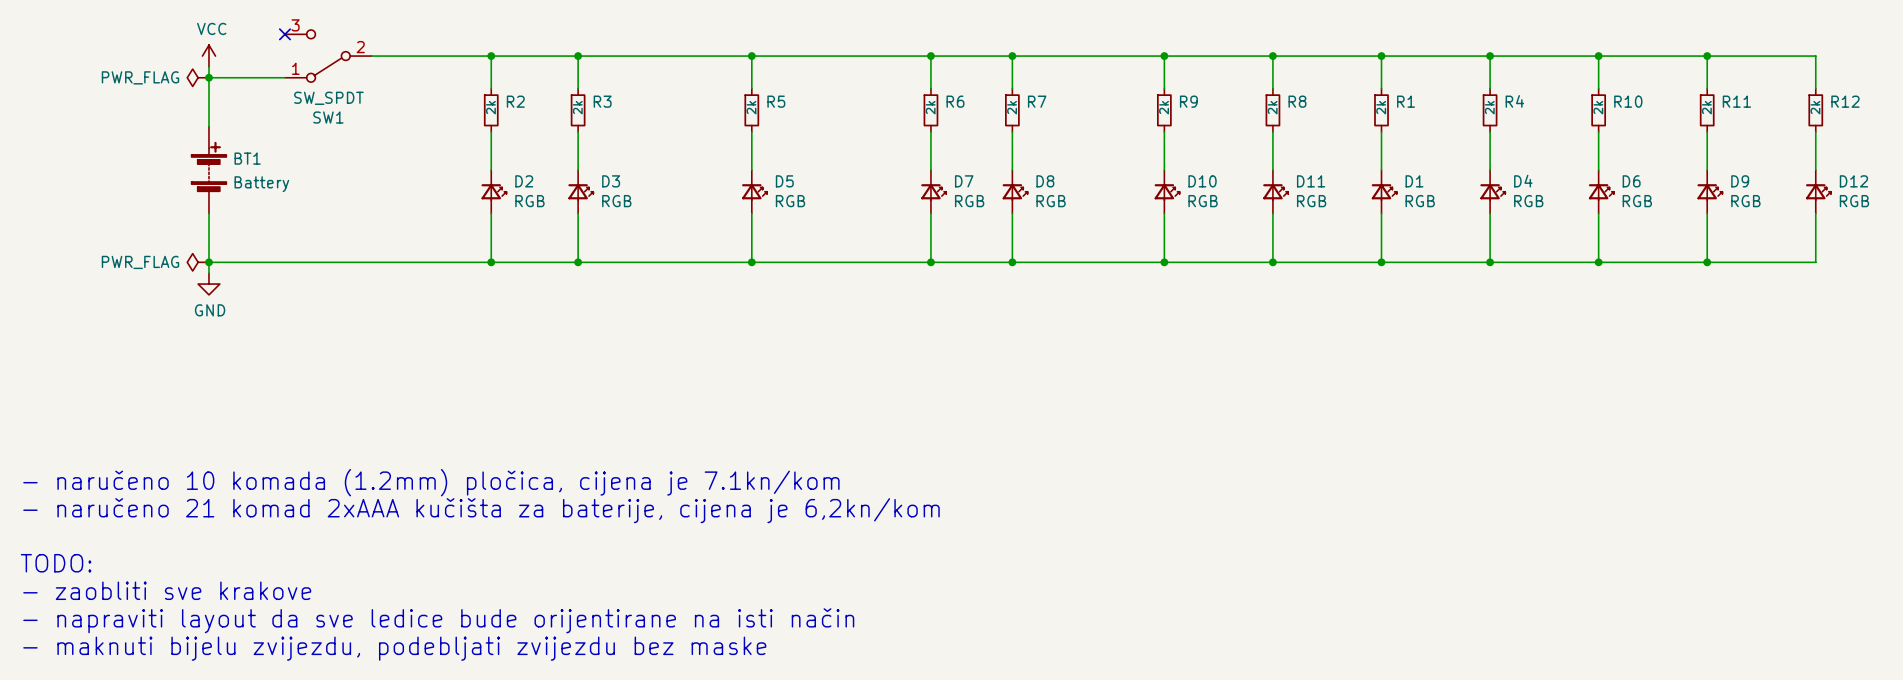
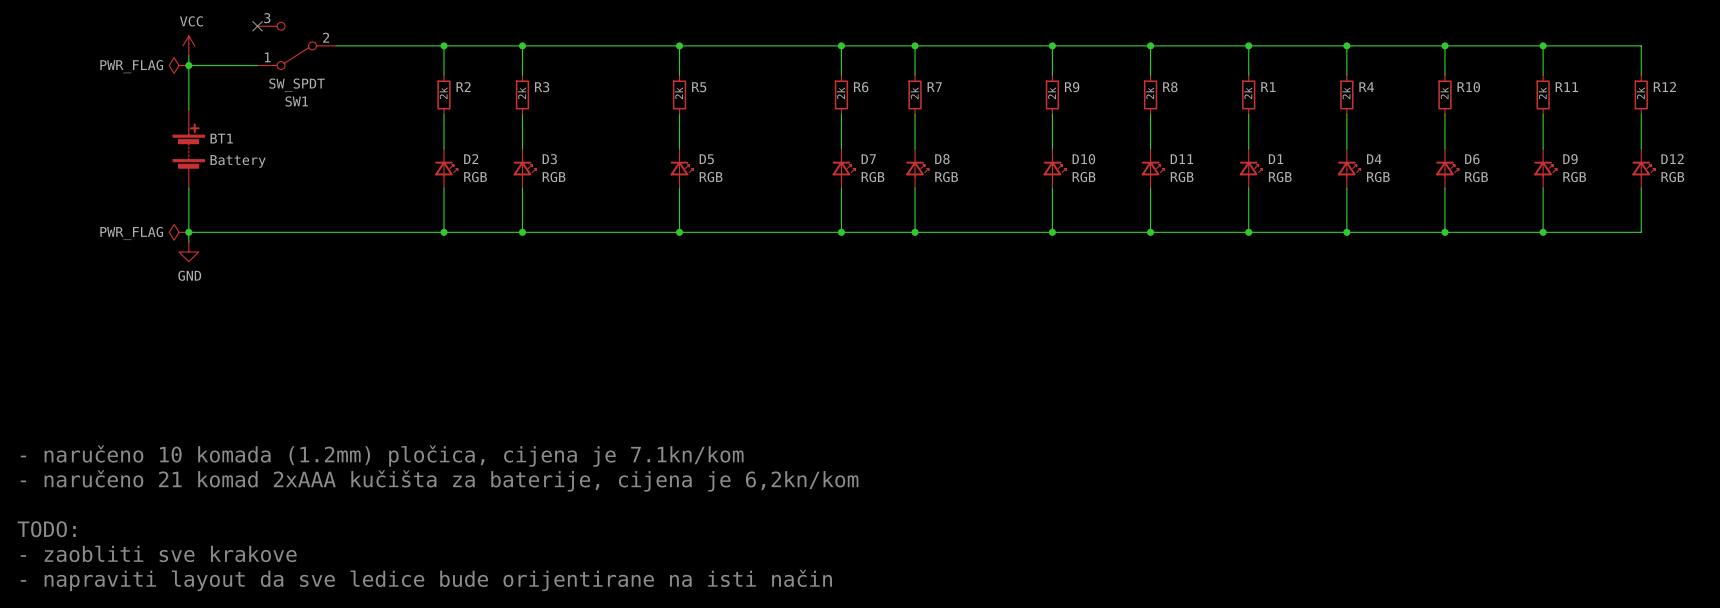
text: - naručeno 10 komada (1.2mm) pločica, cijena je 7.1kn/kom (431, 482) -> none
text: - naručeno 21 komad 2xAAA kučišta za baterije, cijena je 6,2kn/kom (481, 510) -> - naručeno 10 komada (1.2mm) pločica, cijena je 7.1kn/kom (382, 456)
text: none -> - naručeno 21 komad 2xAAA kučišta za baterije, cijena je 6,2kn/kom (439, 480)
text: TODO: (56, 563) -> none
text: - zaobliti sve krakove (167, 590) -> TODO: (46, 529)
text: - napraviti layout da sve ledice bude orijentirane na isti način (438, 620) -> - zaobliti sve krakove (158, 553)
text: - maknuti bijelu zvijezdu, podebljati zvijezdu bez maske (394, 648) -> - napraviti layout da sve ledice bude orijentirane na isti način (426, 580)

